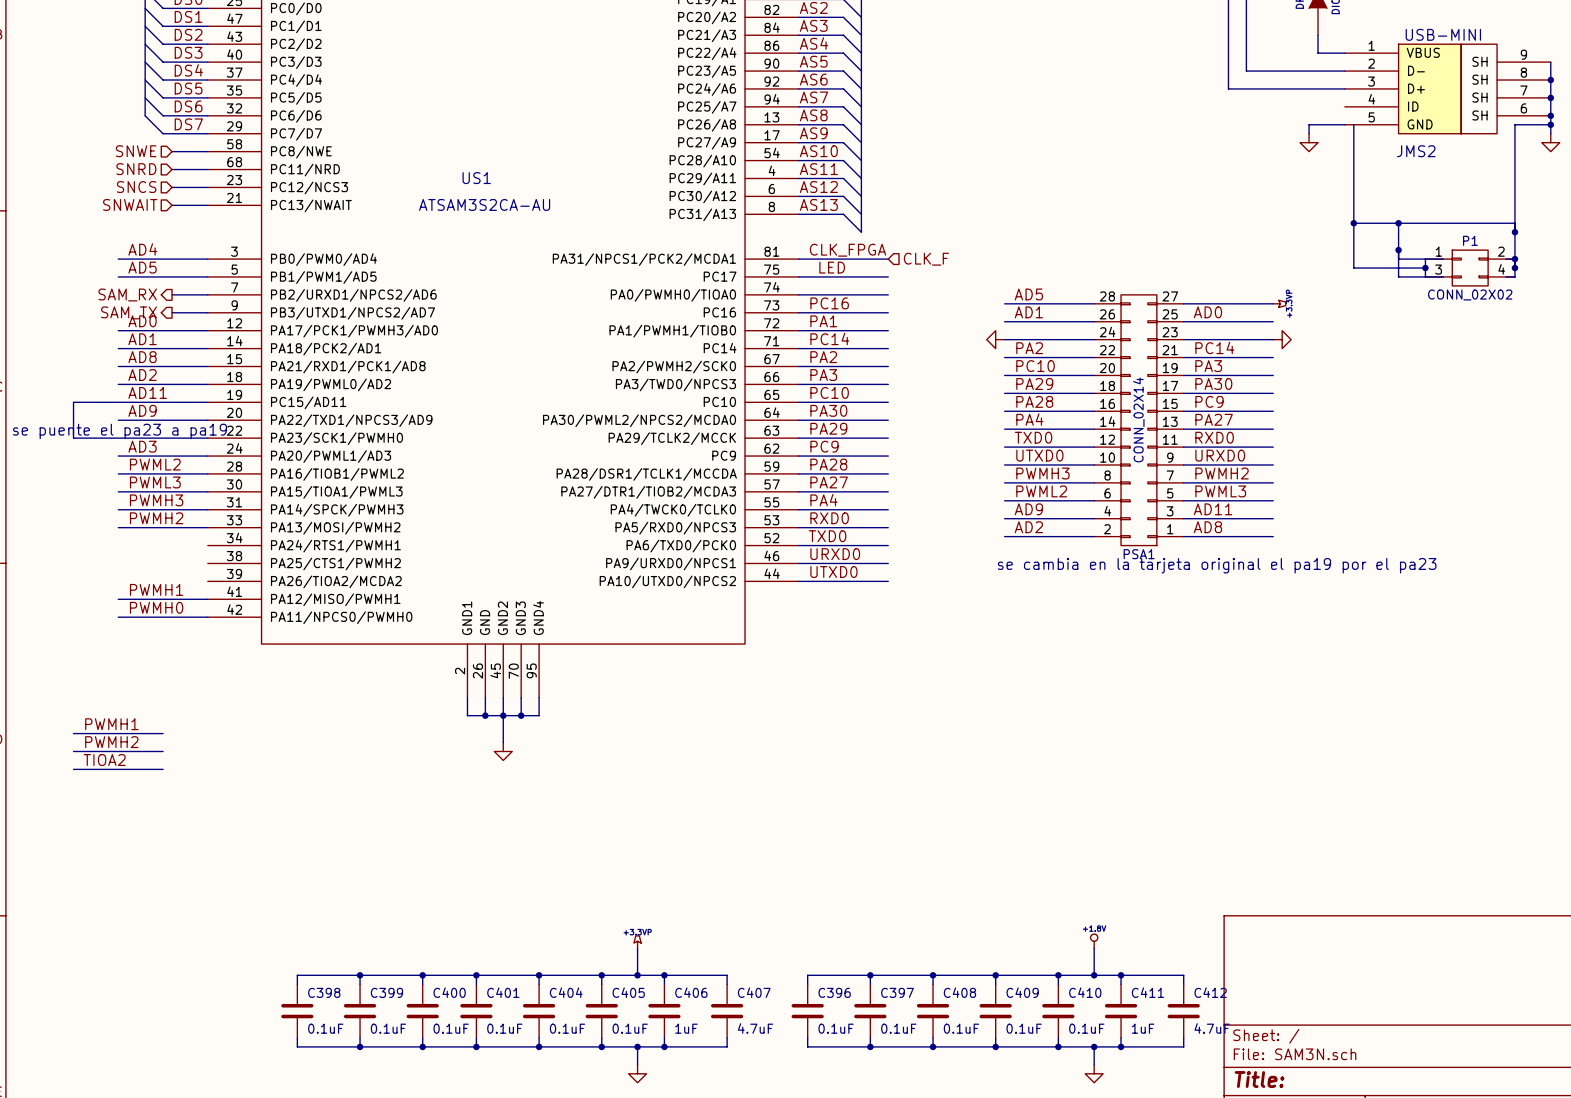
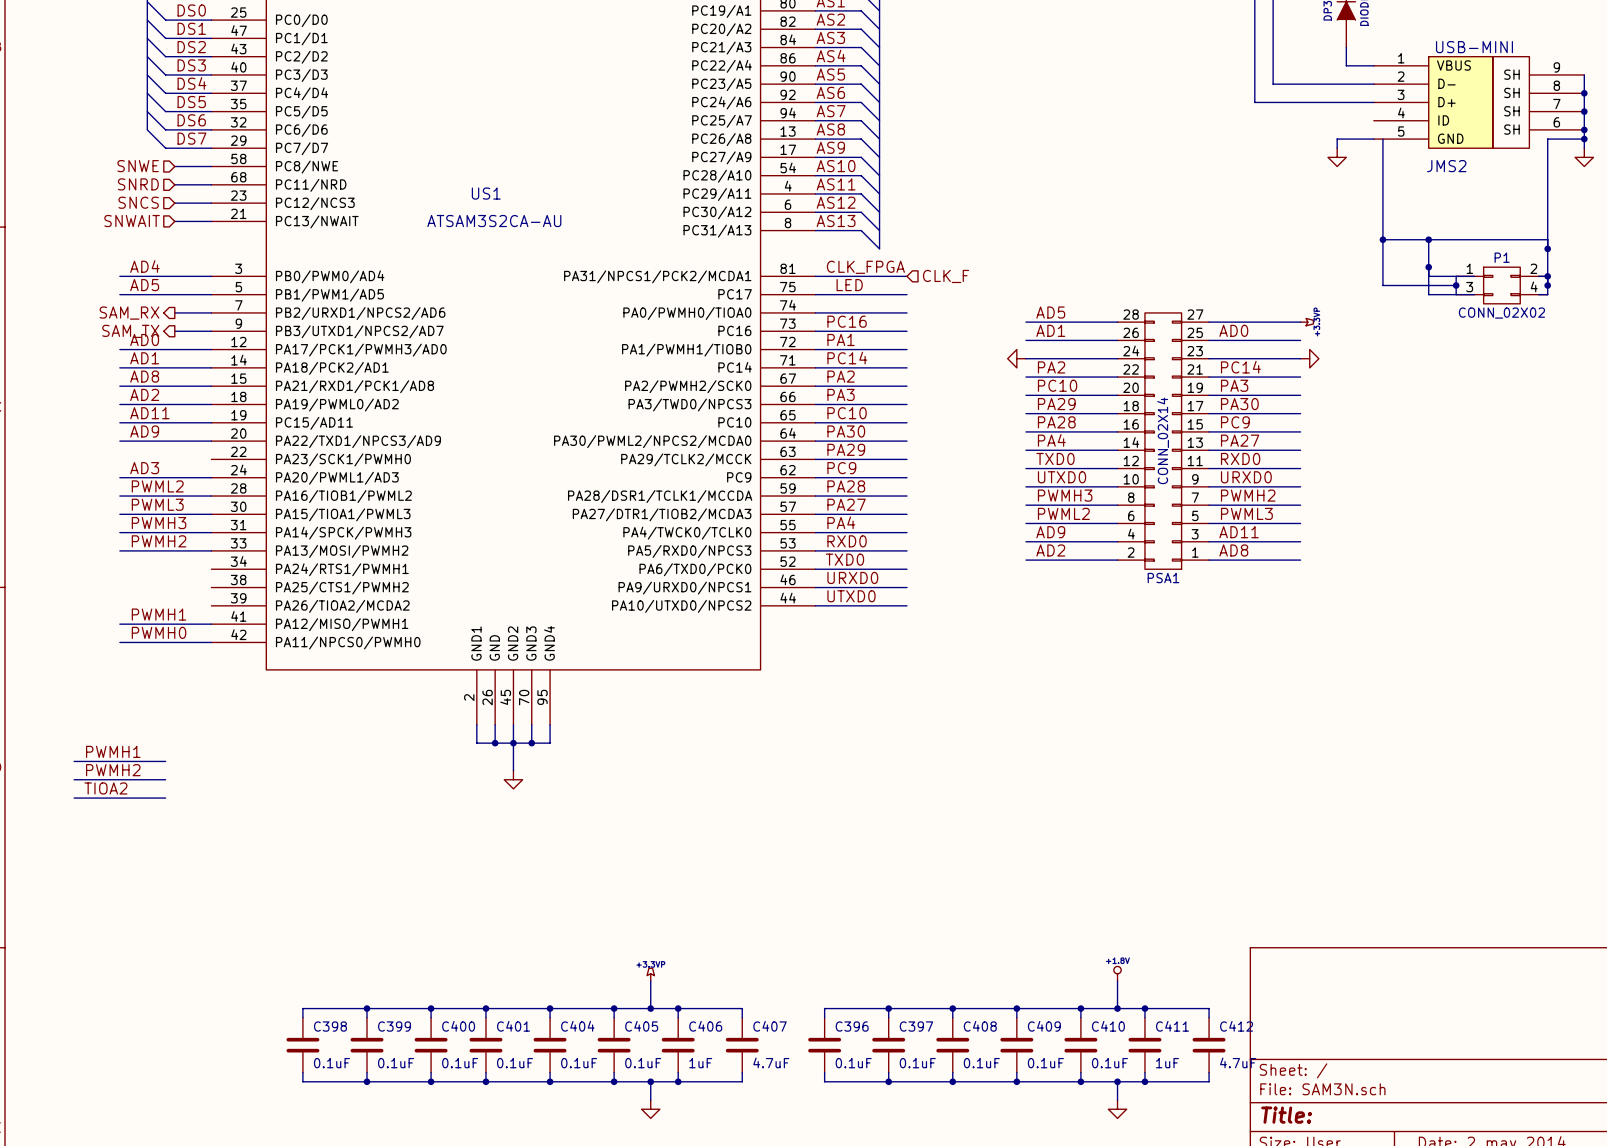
wire: (118, 402) (73, 402) (73, 438) (207, 438) -> none
text: se puente el pa23 a pa19 (120, 431) -> none
text: se cambia en la tarjeta original el pa19 por el pa23 (1217, 565) -> none

